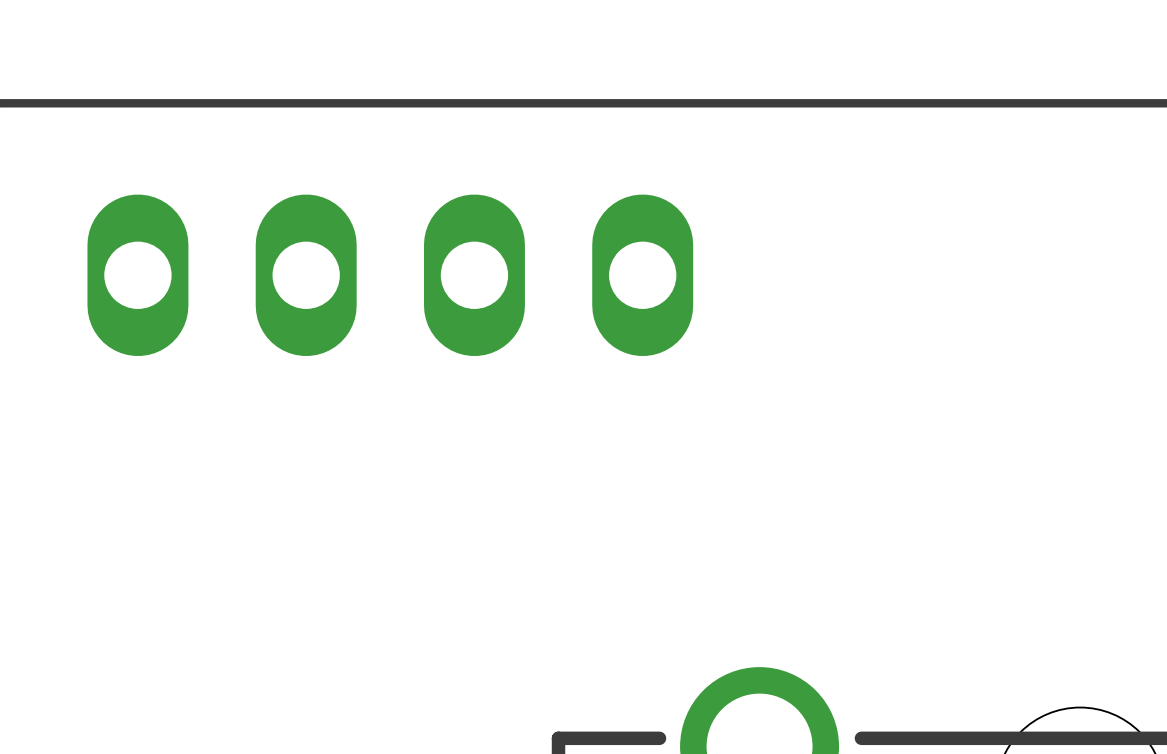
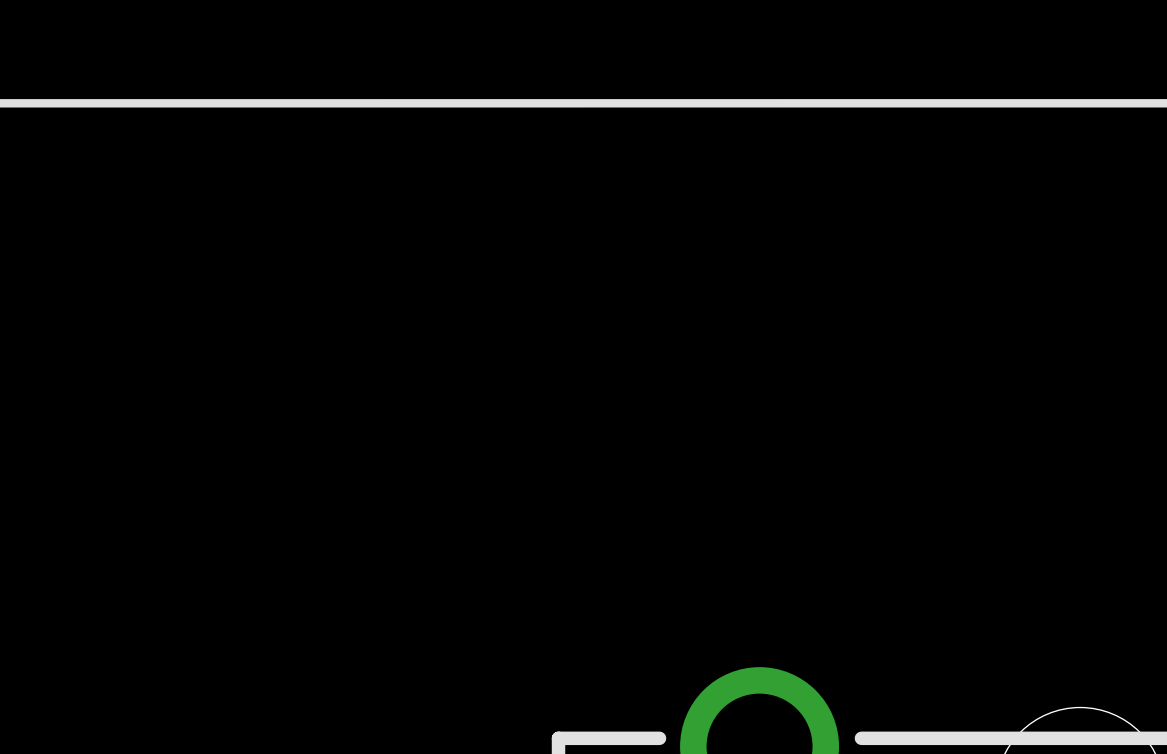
part: (390, 275) -> none

